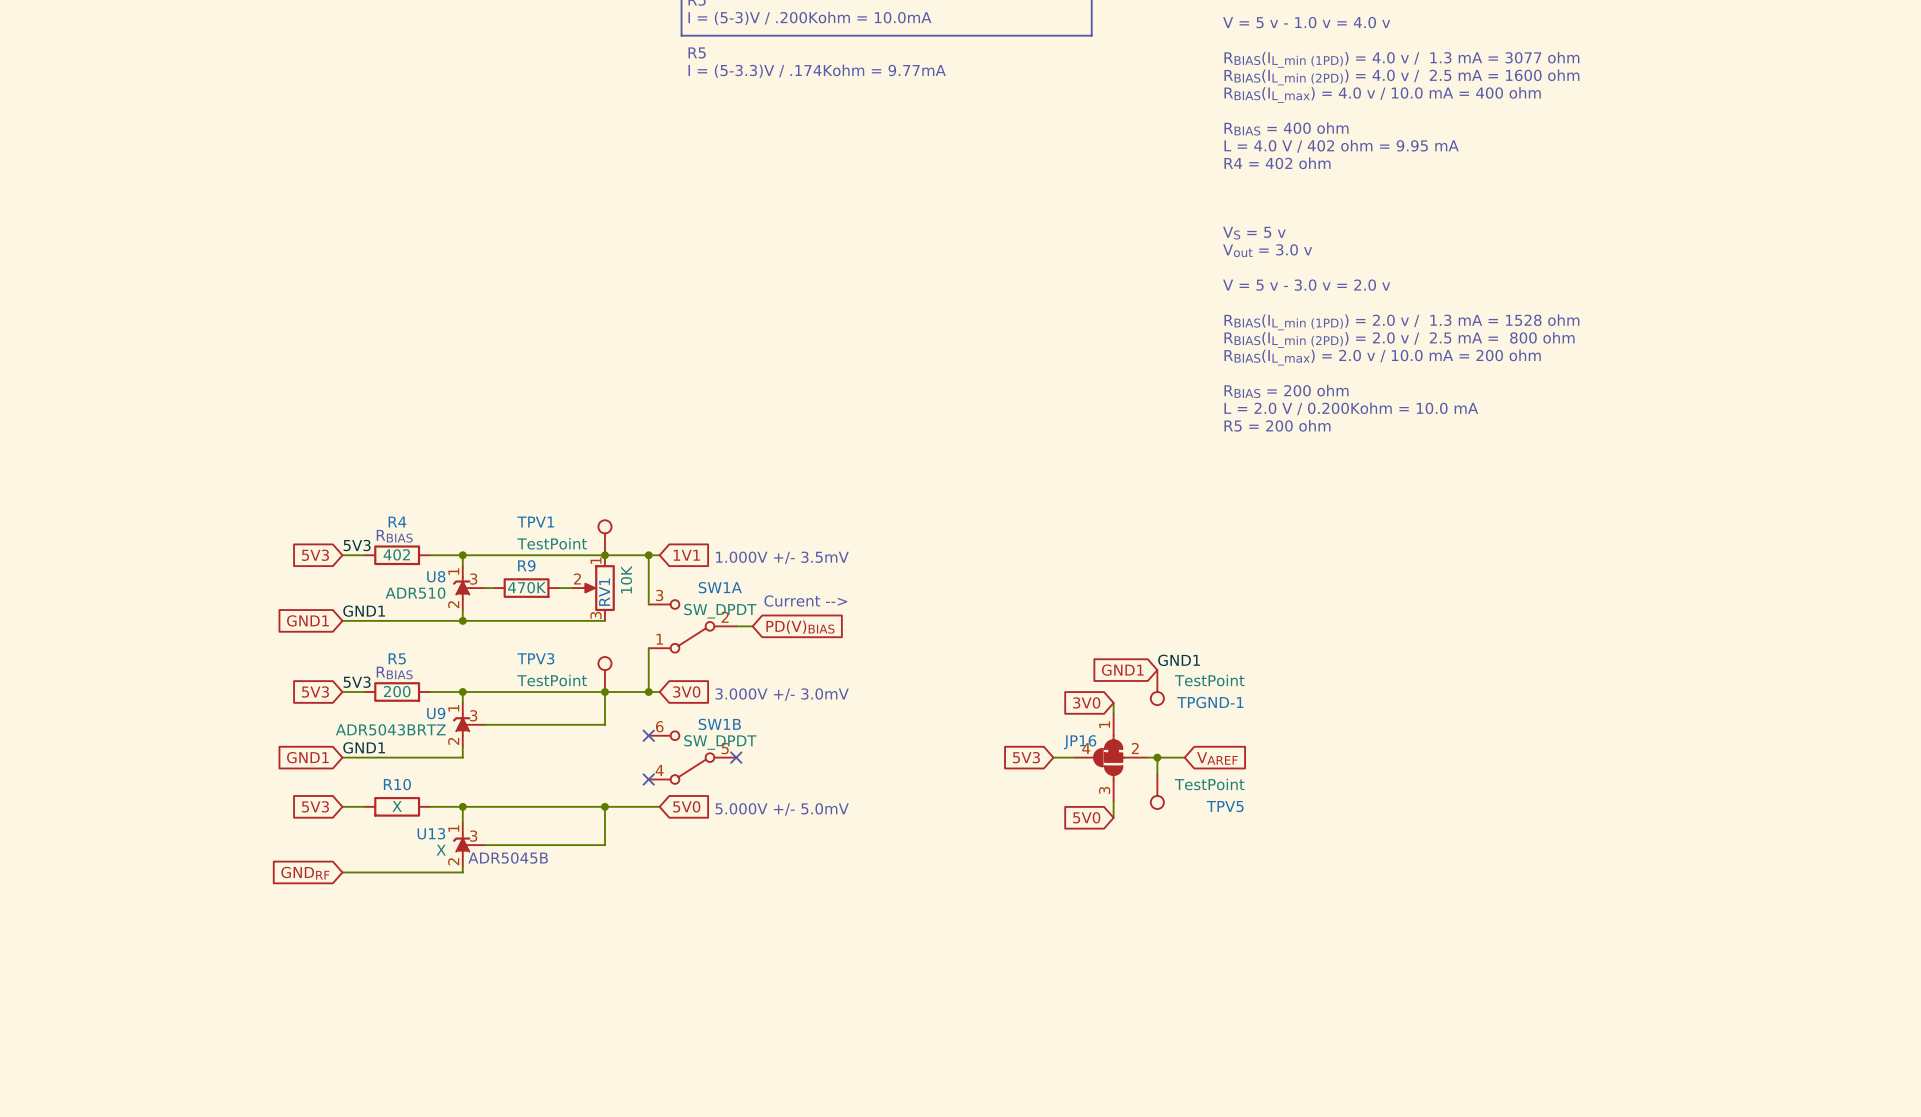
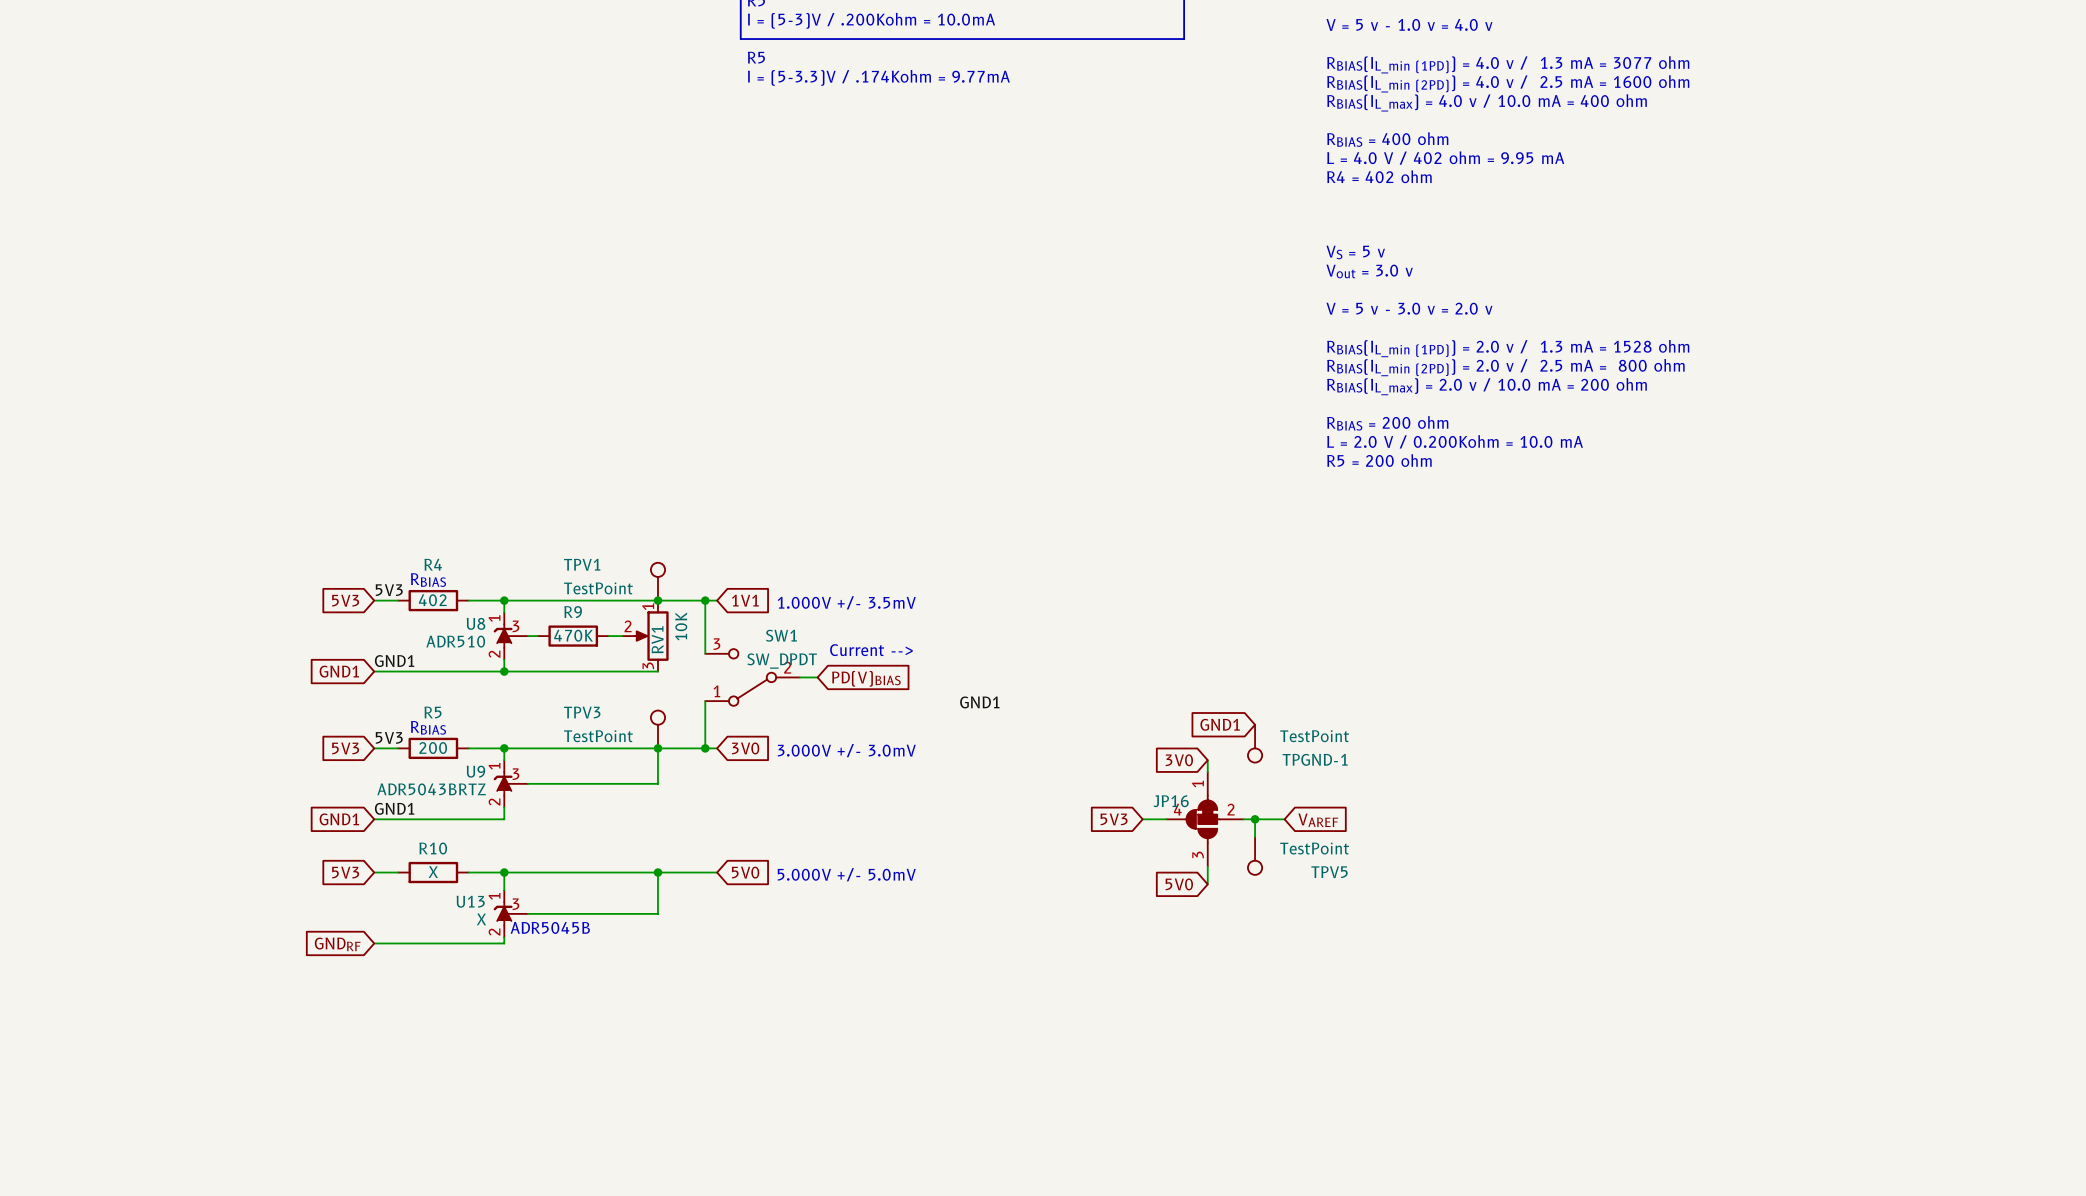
SW1A name: SW1A (720, 587) -> SW1 (781, 635)
label: none -> GND1 (979, 702)
label: GND1 (1179, 660) -> none
no-connect mark: (648, 735) -> none
SW1B: SW_DPDT (692, 757) -> none
no-connect mark: (736, 757) -> none
no-connect mark: (648, 779) -> none

